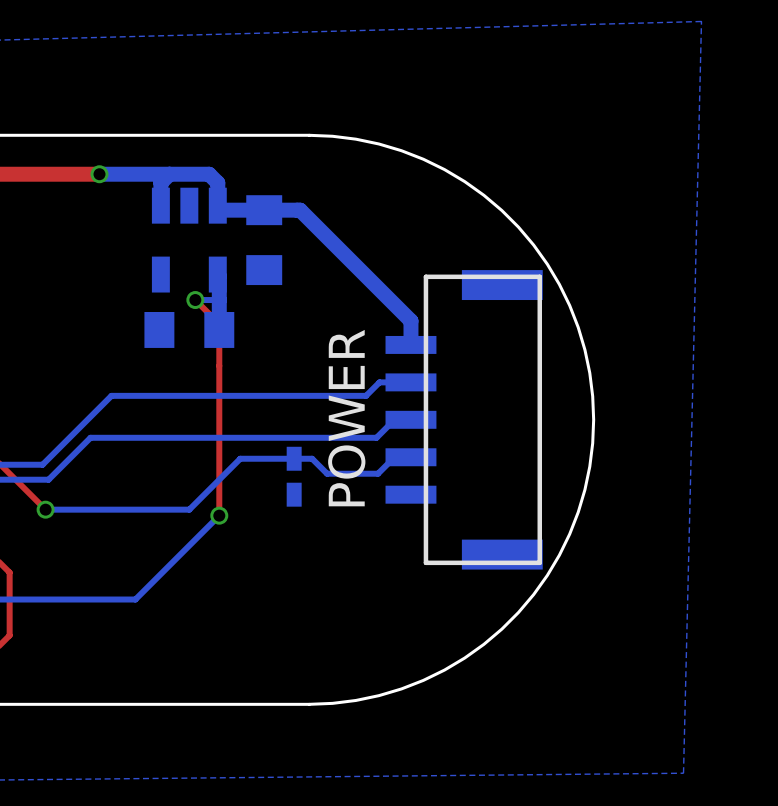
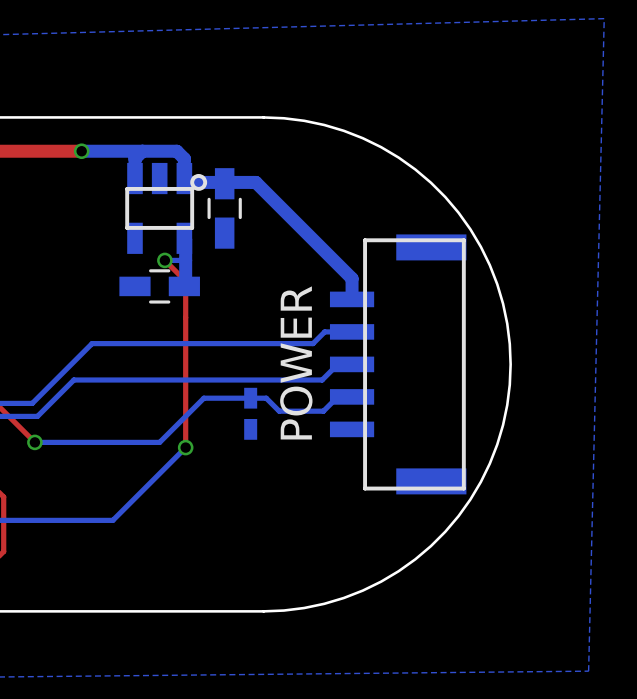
part footprint: [151, 187, 227, 293] -> [125, 162, 208, 254]
part footprint: [246, 195, 283, 286] -> [207, 168, 242, 249]
part footprint: [144, 312, 235, 348] -> [119, 269, 200, 304]

